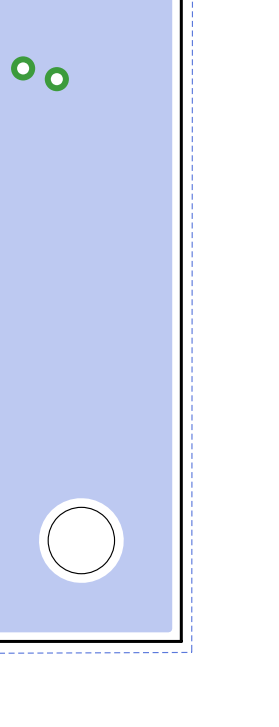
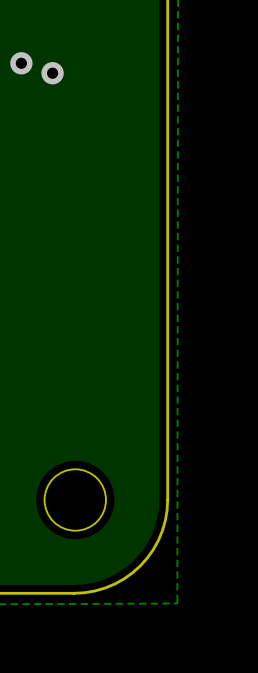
board edge: (181, 540) (181, 641) (80, 641) -> (167, 499) (162, 530) (153, 549) (140, 565) (114, 584) (94, 590) (74, 593)

